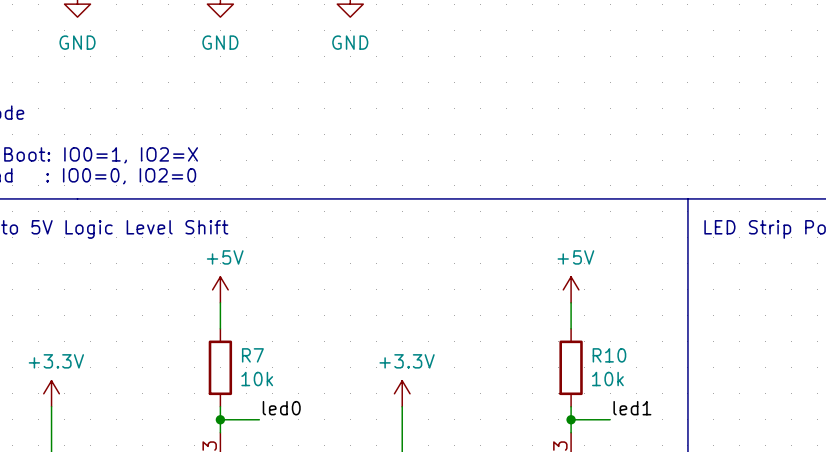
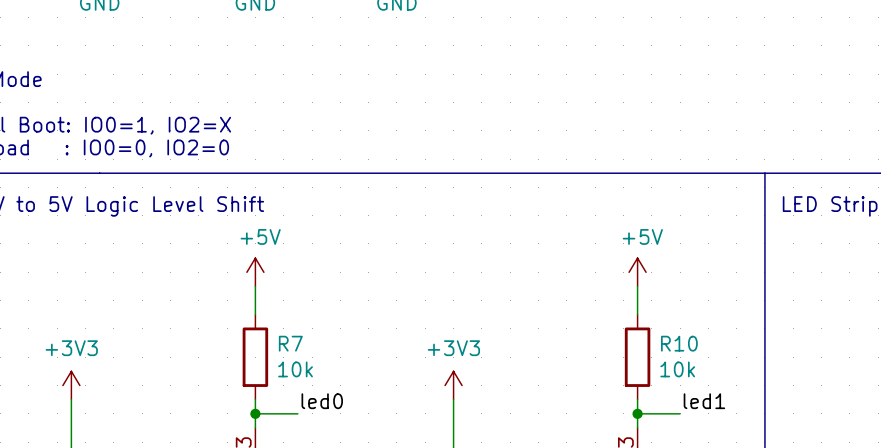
power symbol: +3.3V (51, 393) -> +3V3 (71, 385)
power symbol: +3.3V (402, 393) -> +3V3 (453, 385)

